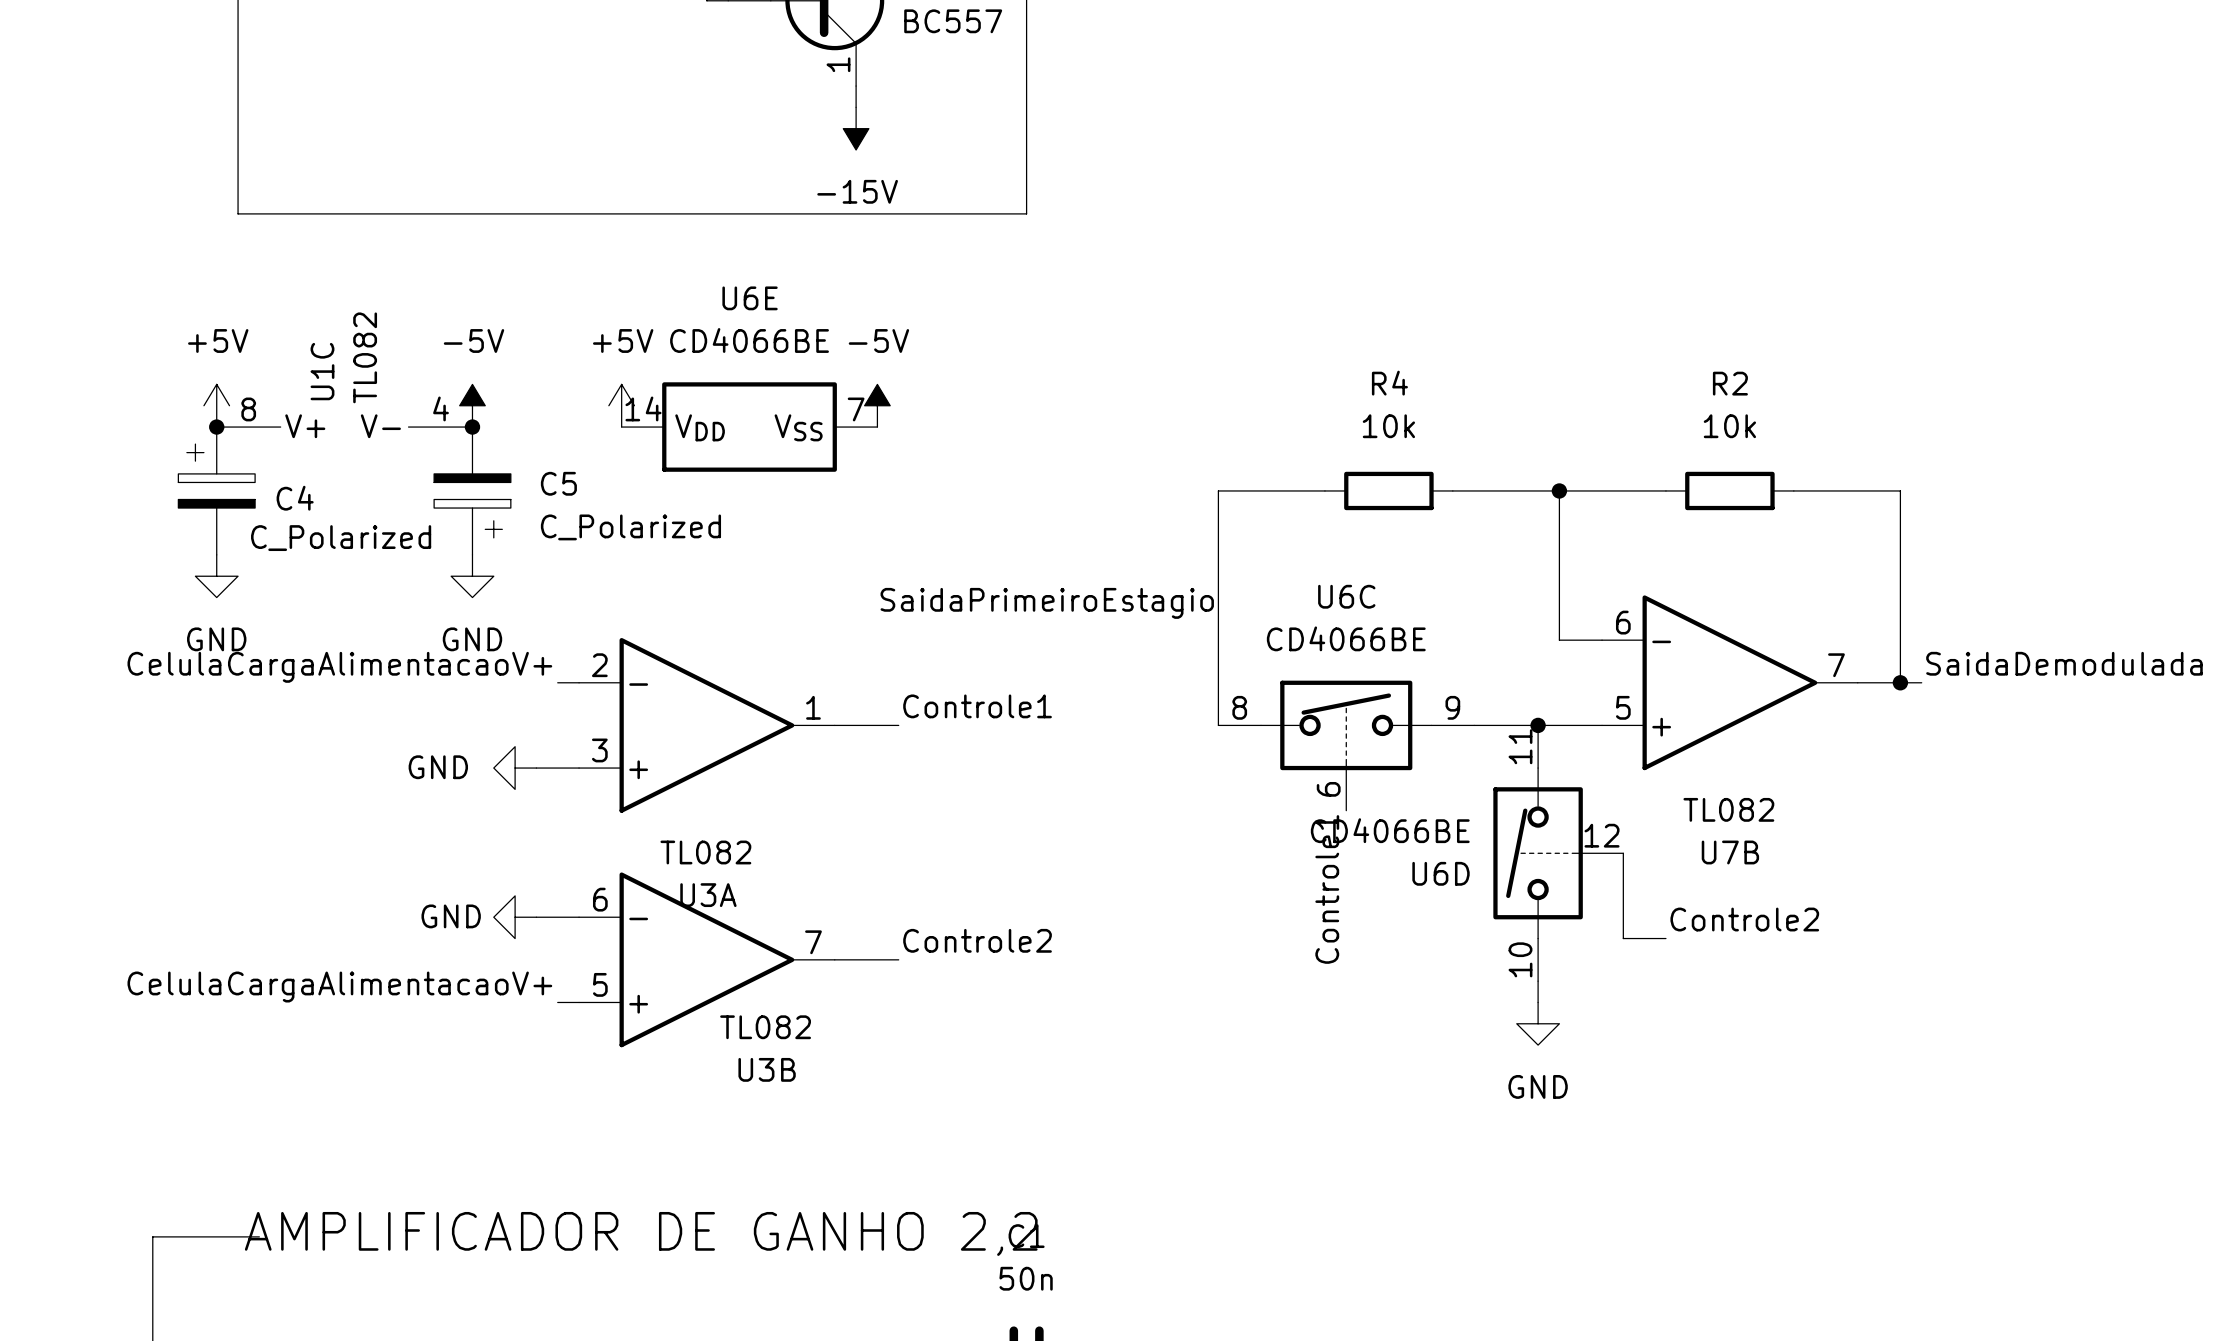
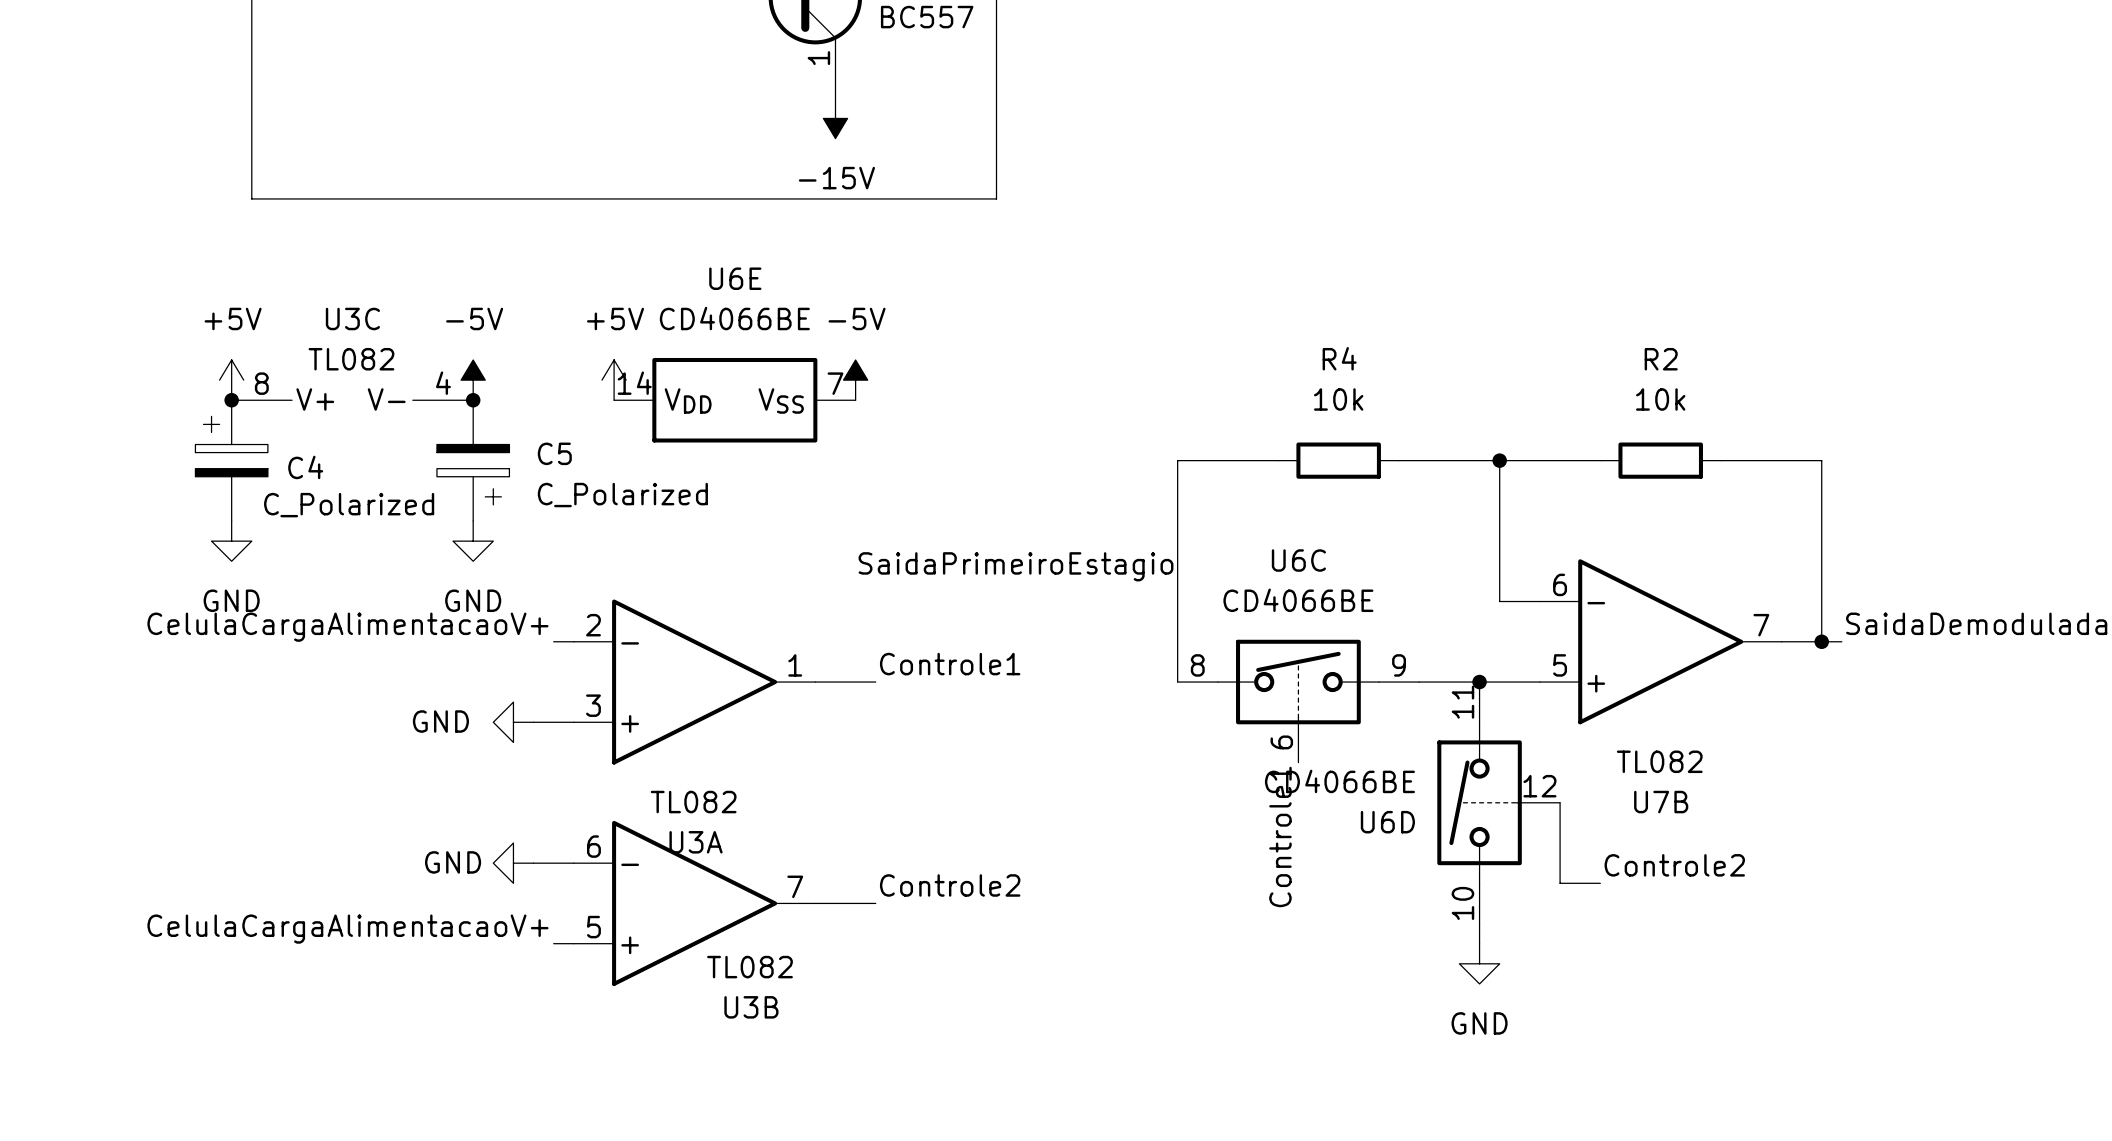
U1C value rotation: 0° (365, 357) -> 90° clockwise (351, 359)
U1C name: U1C (322, 371) -> U3C (352, 318)

